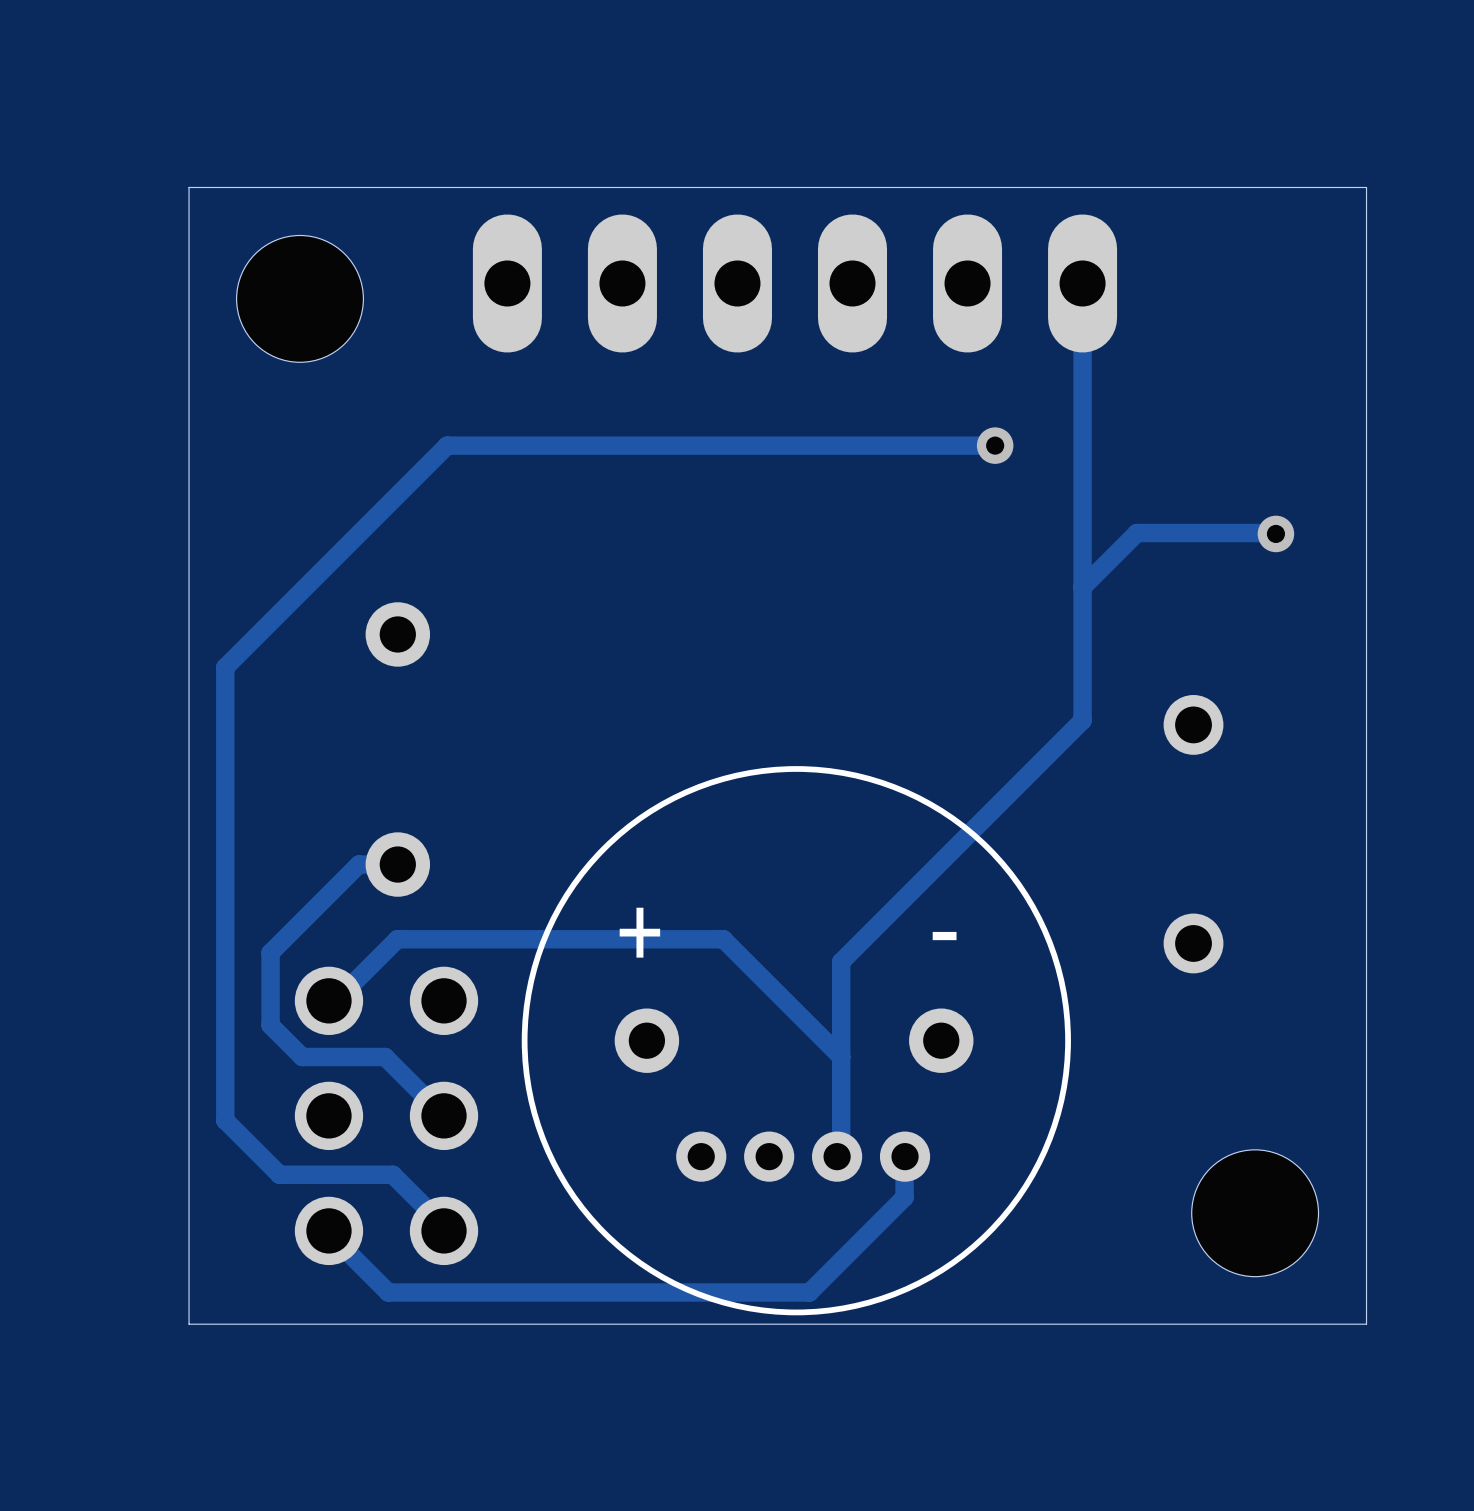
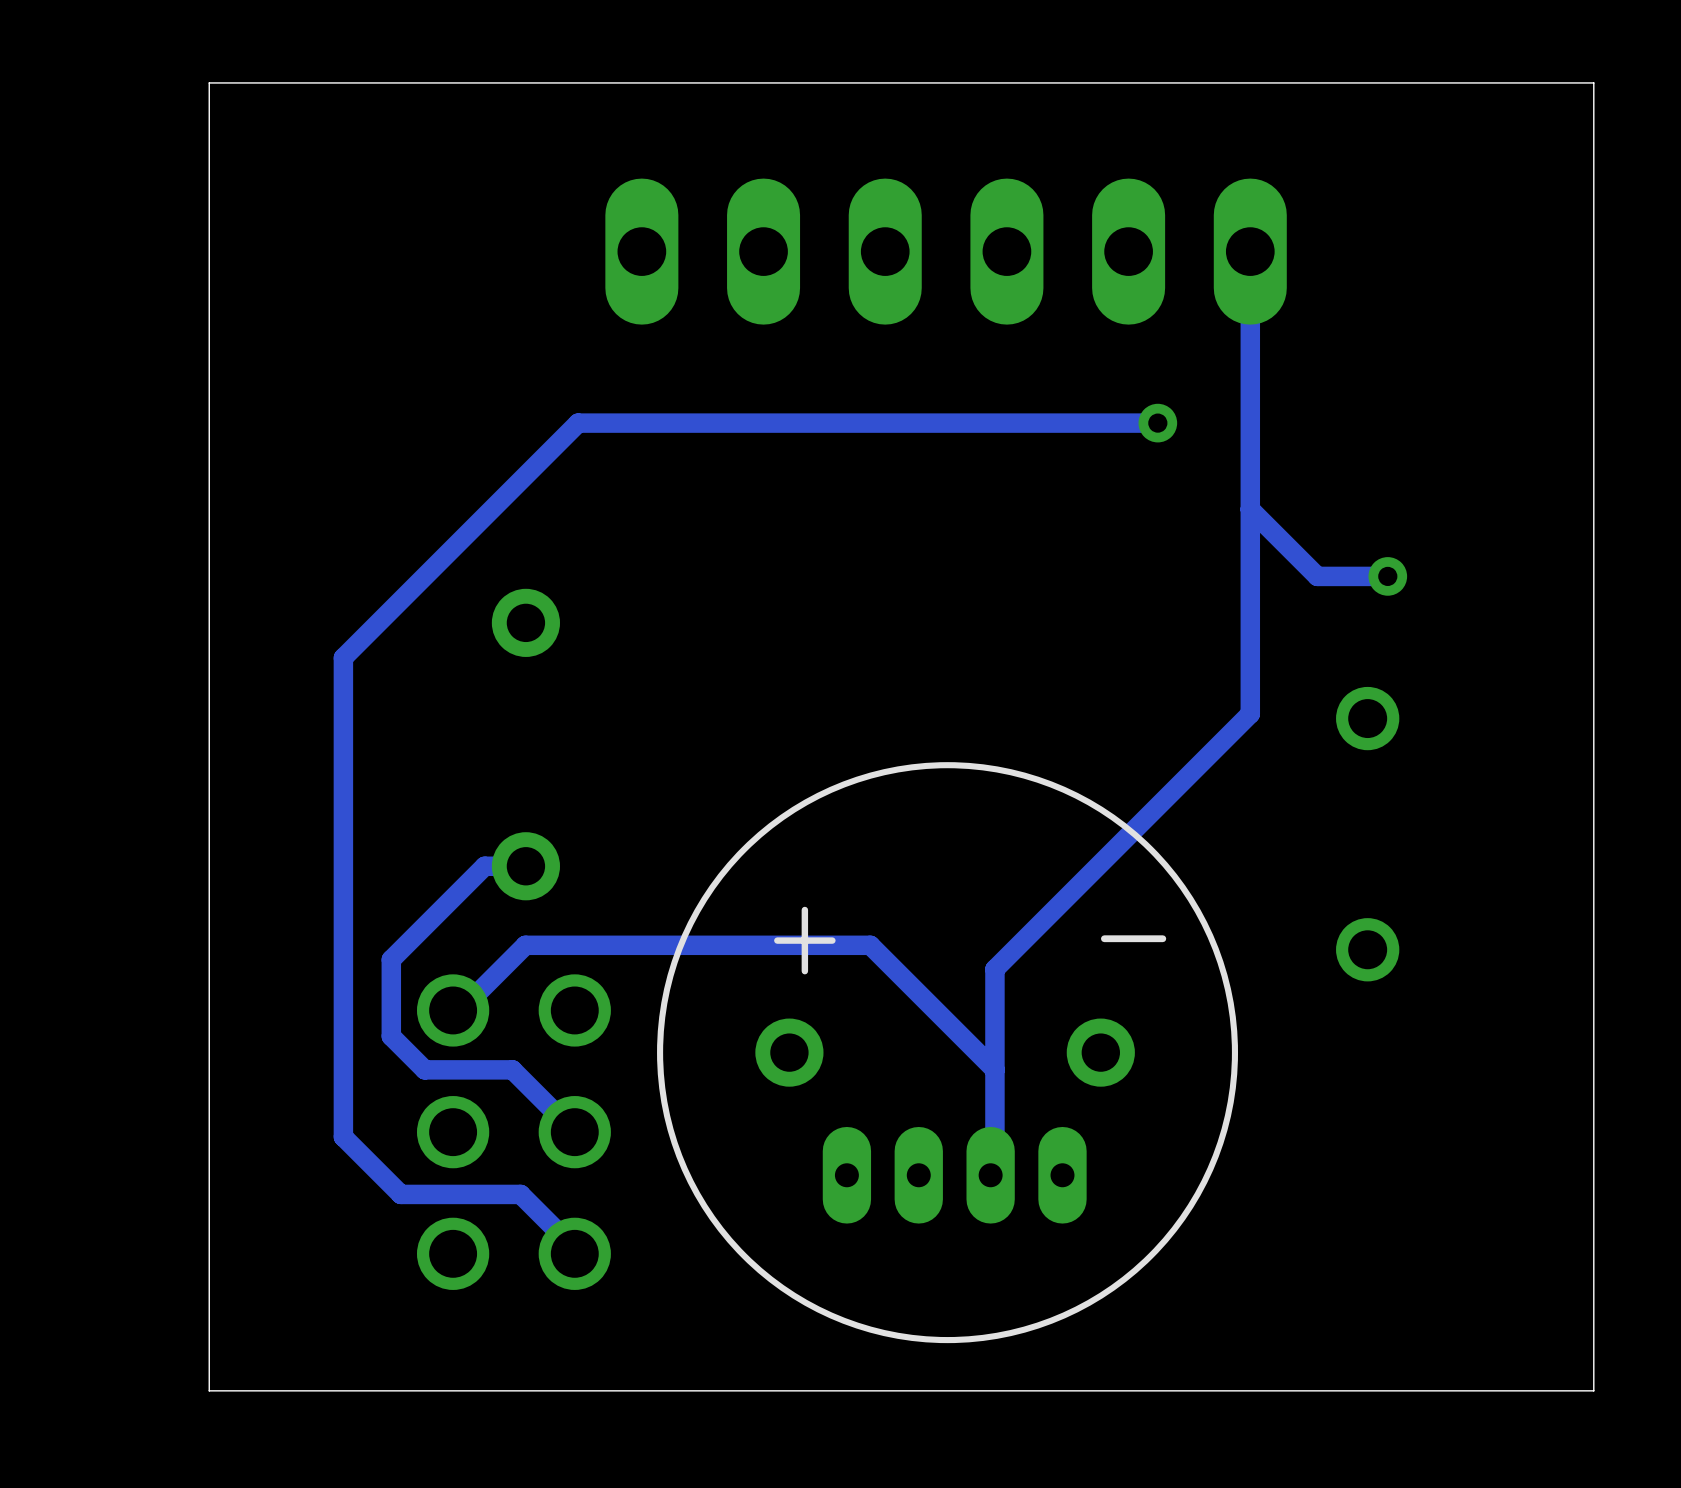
board edge: (1366, 187) (189, 187) (189, 1324) (1366, 1324) (1366, 187) -> (1593, 82) (1593, 1390) (209, 1390) (209, 82) (1593, 82)
hole: (299, 298) -> none
track: none -> (1250, 509) (1317, 576) (1387, 576)
track: (1275, 533) (1136, 533) (1082, 587) -> none
via position: (1275, 533) -> (1387, 576)
part footprint: [676, 1131, 931, 1182] -> [822, 1126, 1087, 1224]
track: (904, 1157) (904, 1197) (809, 1292) (388, 1292) (328, 1233) (328, 1230) -> none
hole: (1255, 1213) -> none

